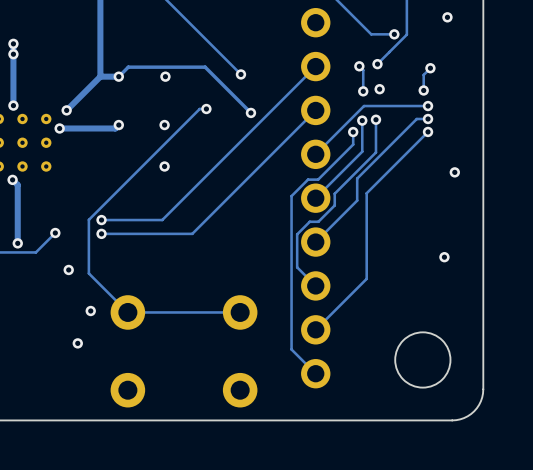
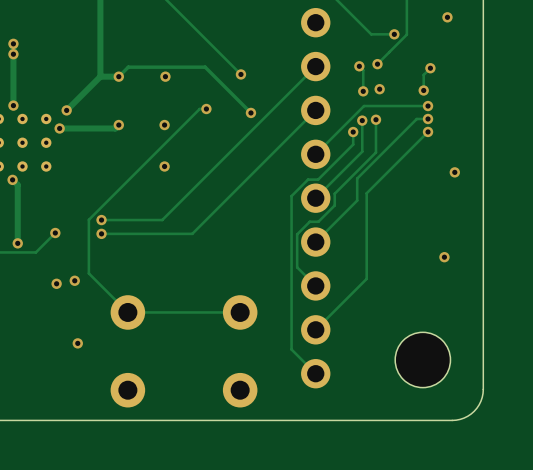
via: (68, 269) -> none
via: none -> (74, 280)
via: none -> (56, 283)
via: (90, 311) -> none

